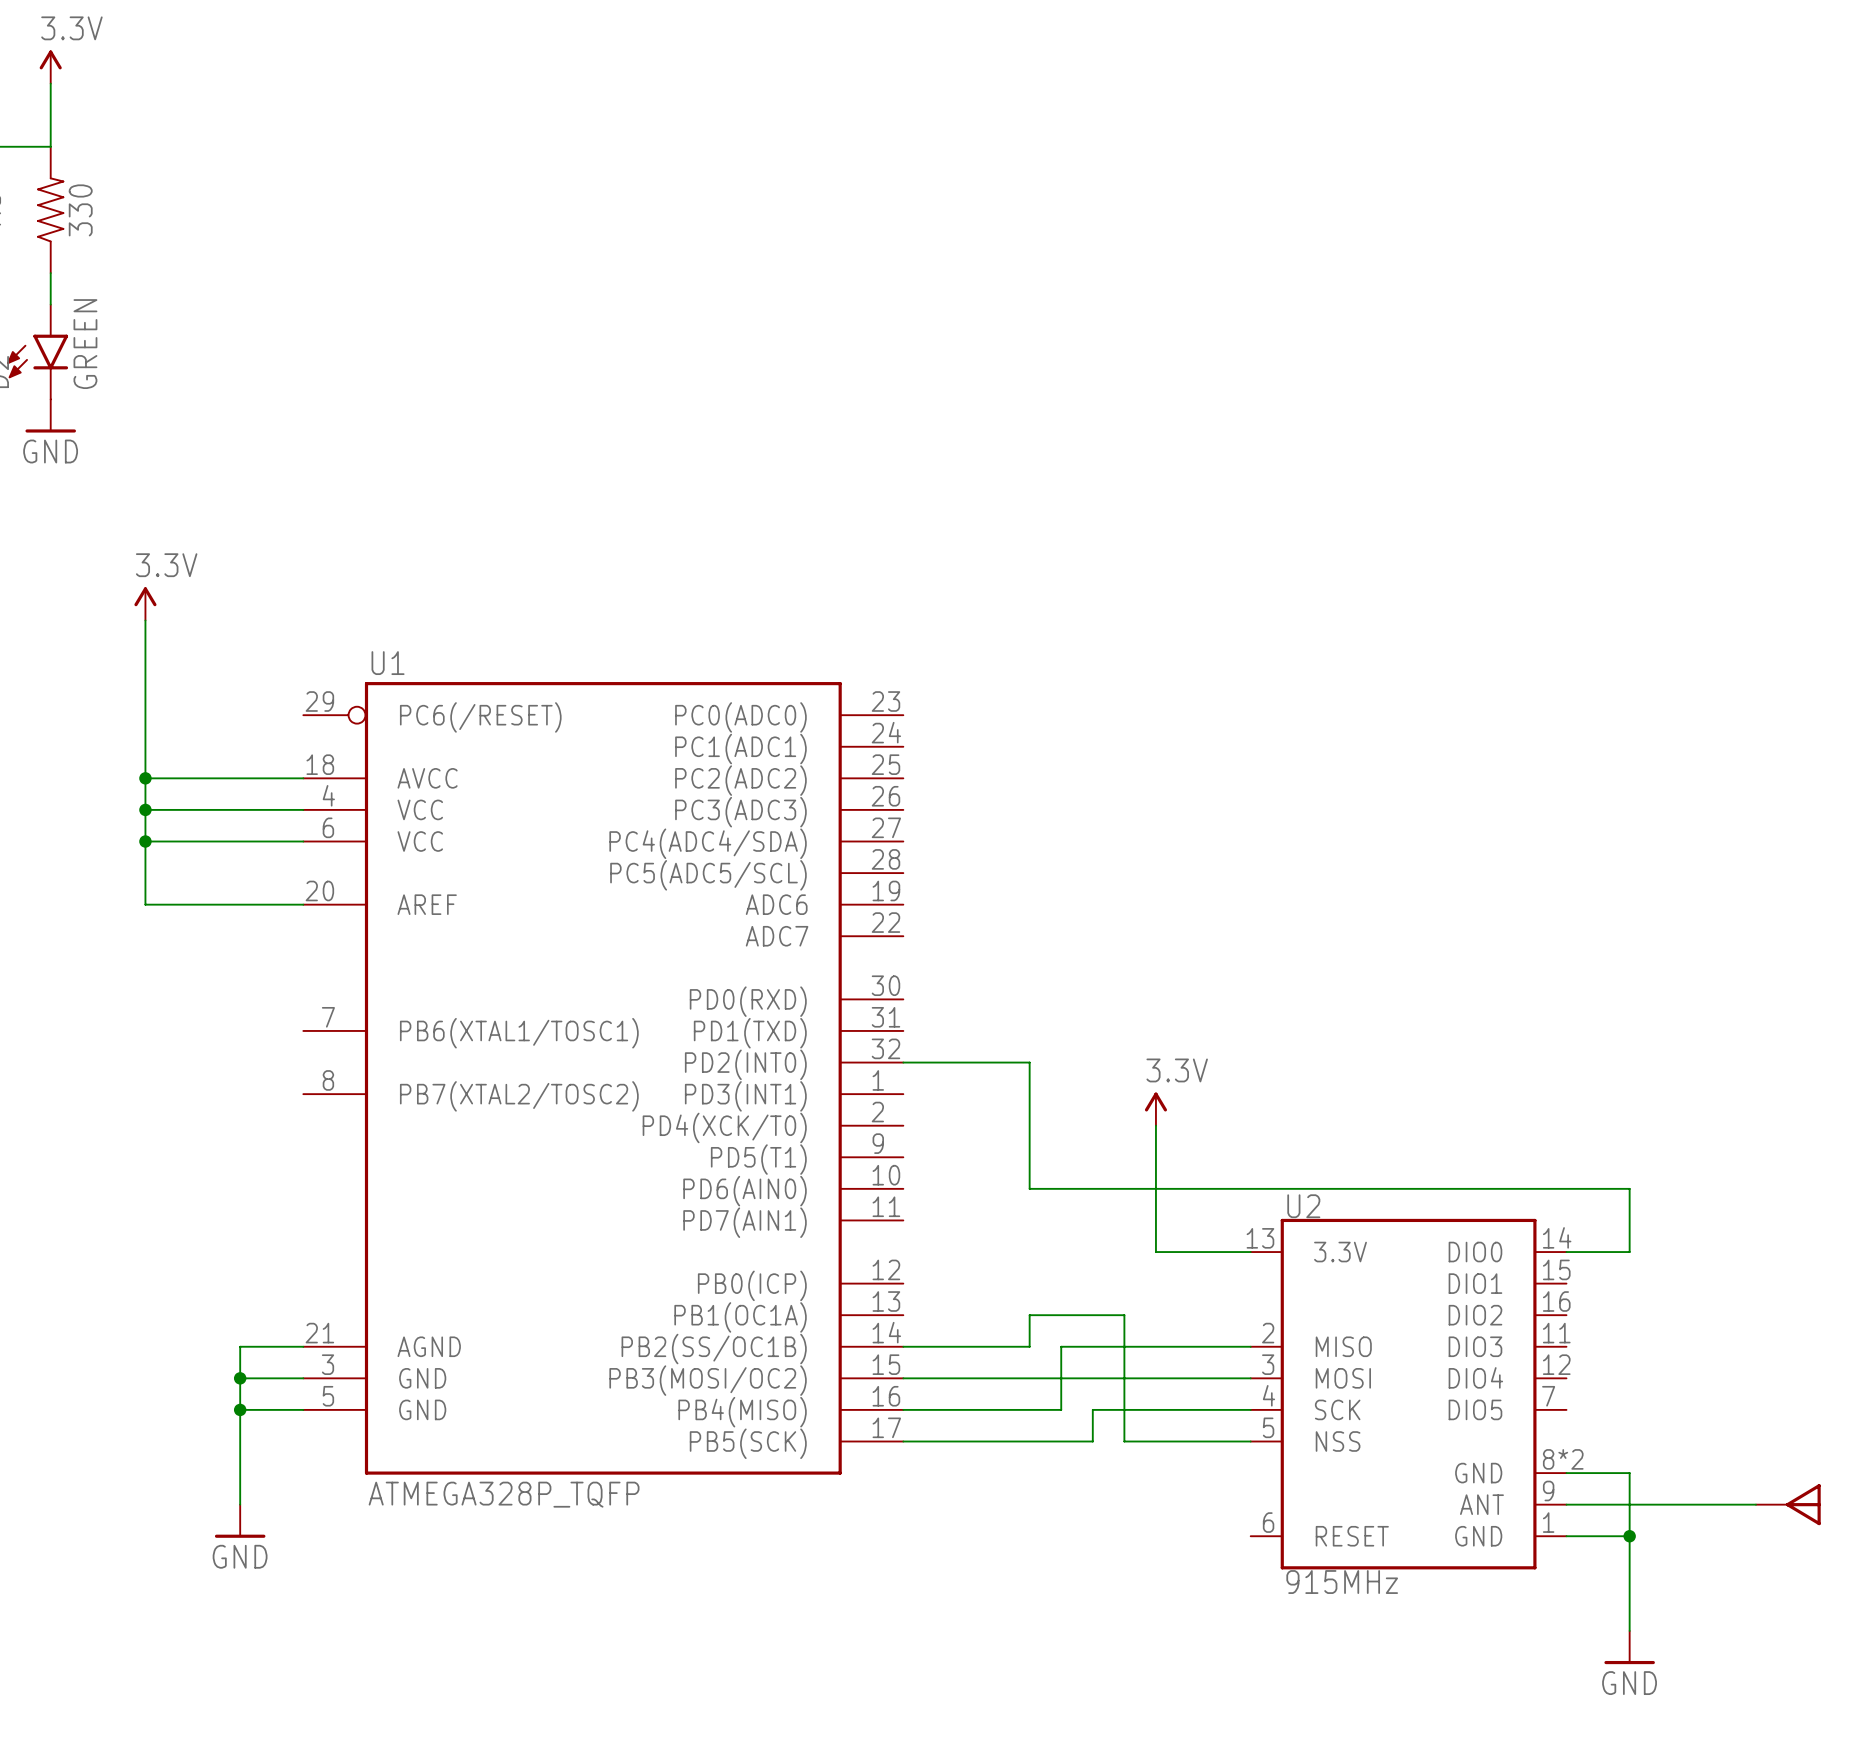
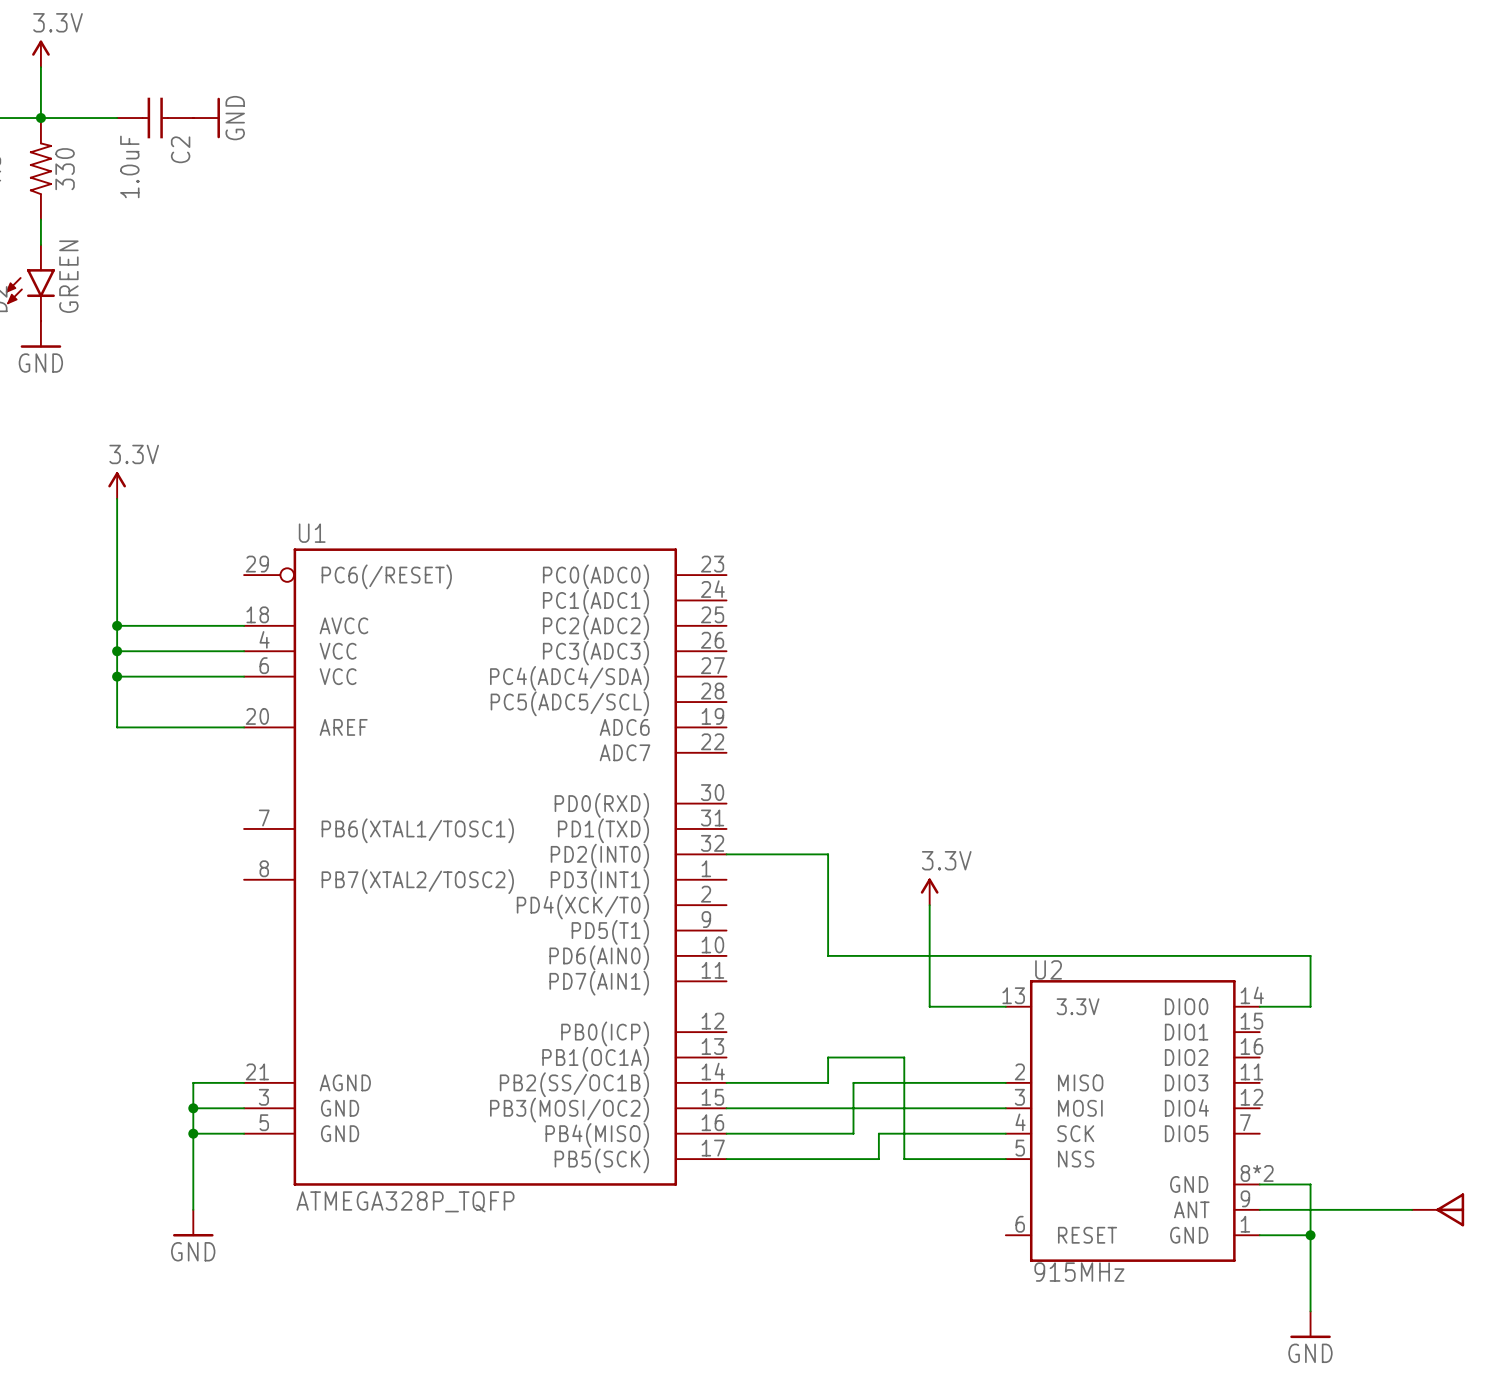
wire: none -> (40, 118) (117, 118)
junction: none -> (40, 118)
C2: none -> 1.0uF (155, 118)
power symbol: none -> GND (206, 118)

